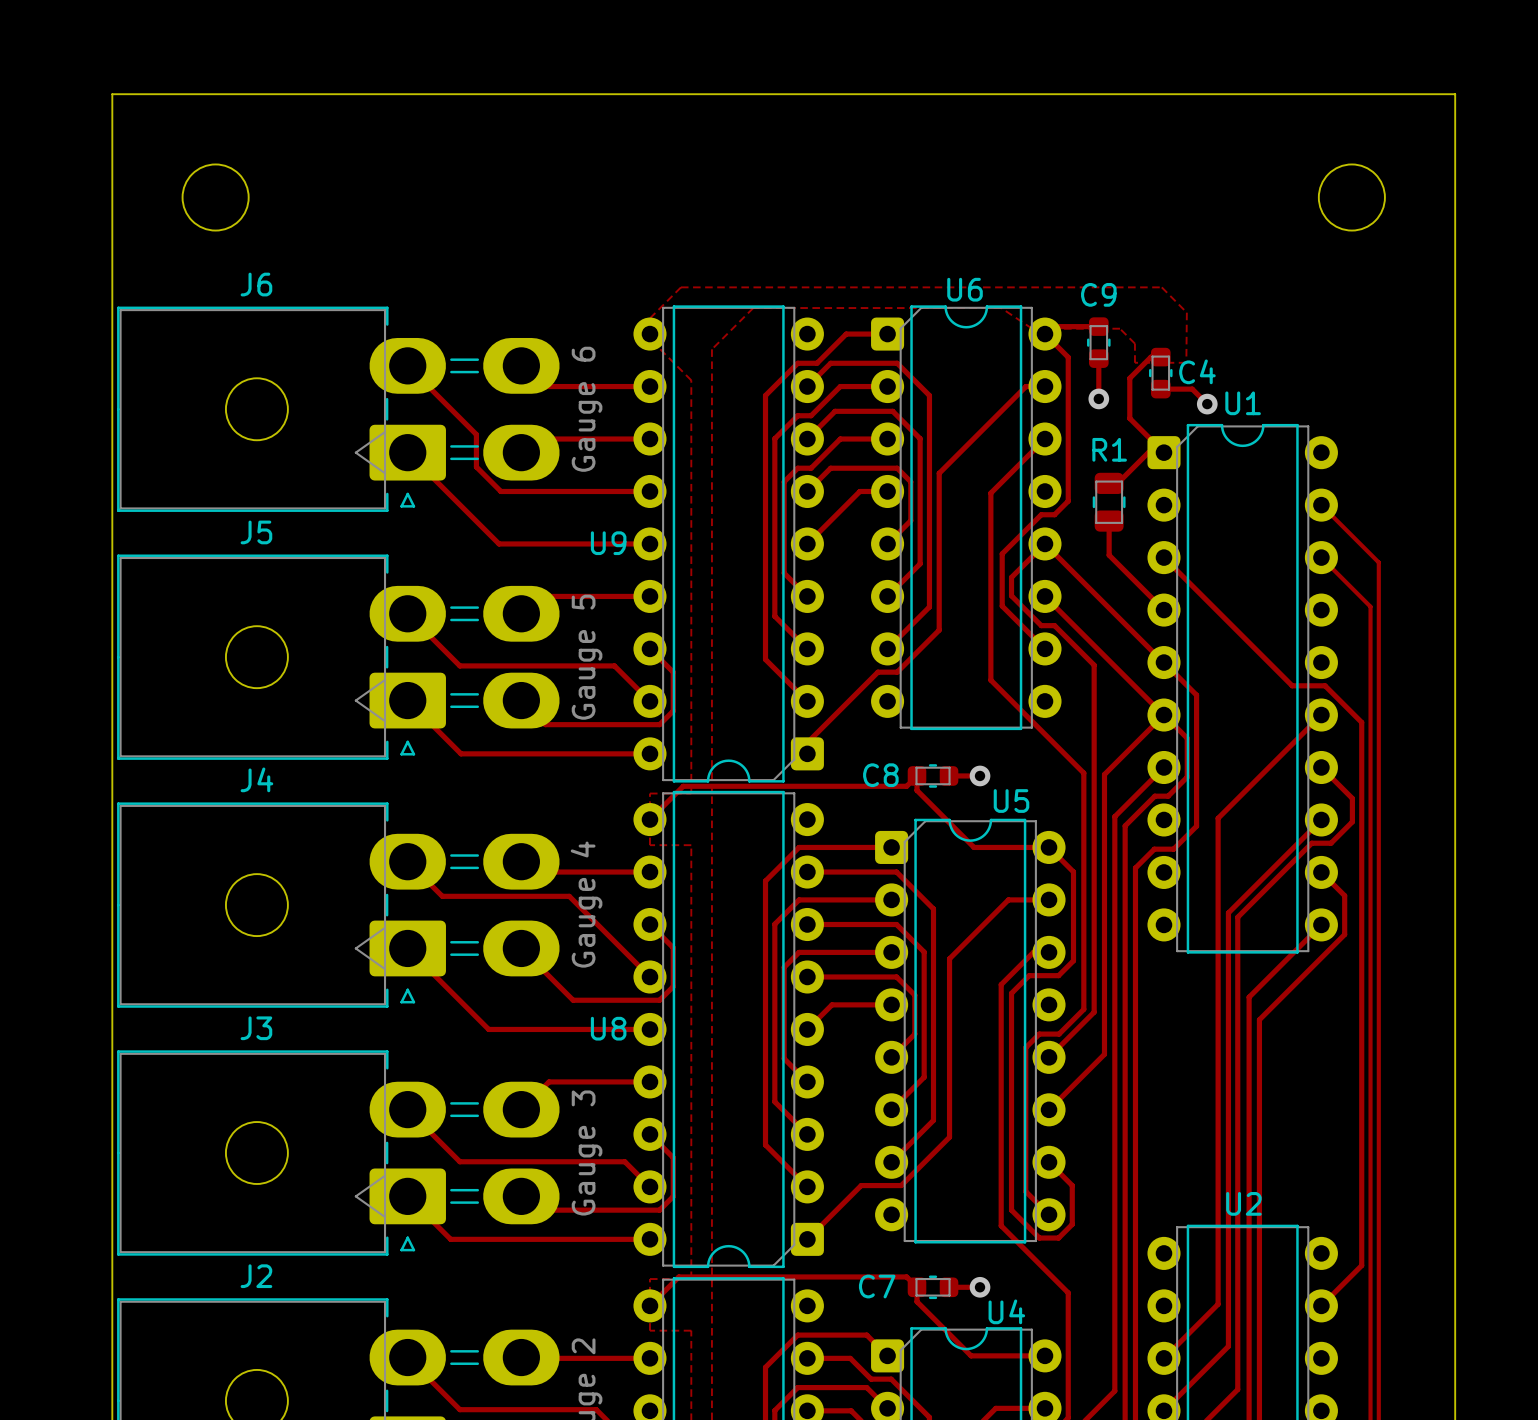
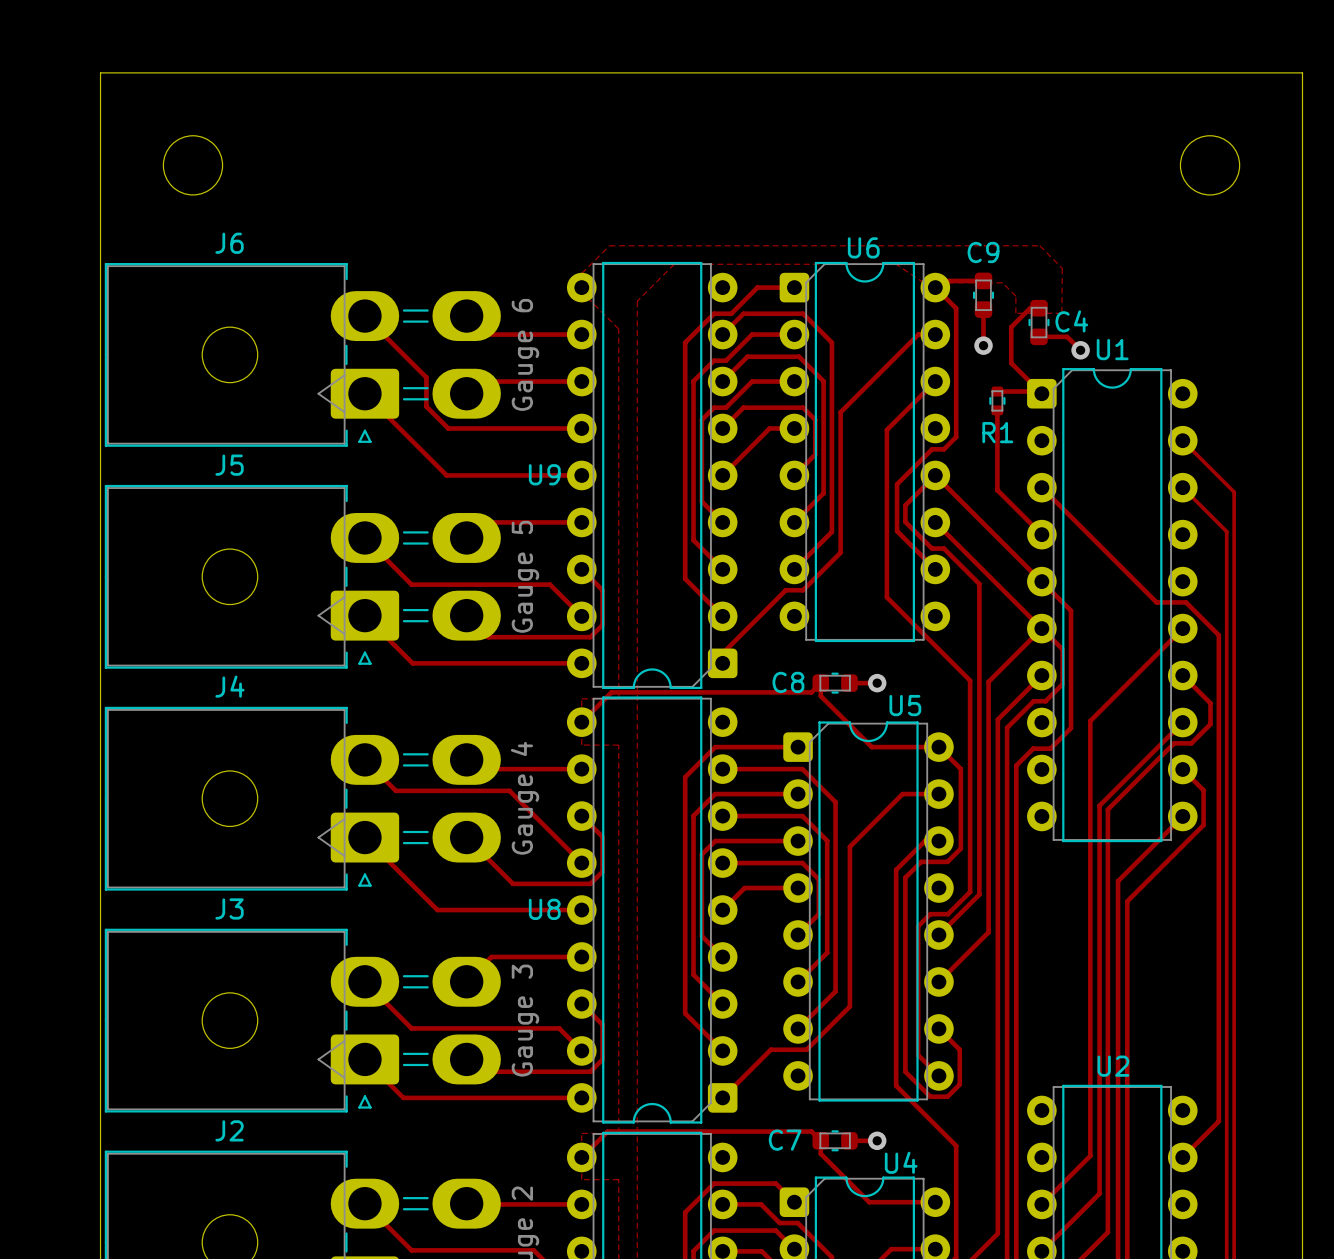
R1 name position: R1 (1109, 449) -> R1 (997, 432)
track: none -> (997, 391) (1039, 391)
track: (1163, 452) (1148, 452) (1117, 483) (1109, 483) -> none
R1 footprint: [1092, 472, 1126, 532] -> [989, 386, 1006, 416]
track: (1109, 521) (1109, 555) (1114, 560) -> (997, 410) (997, 490)

